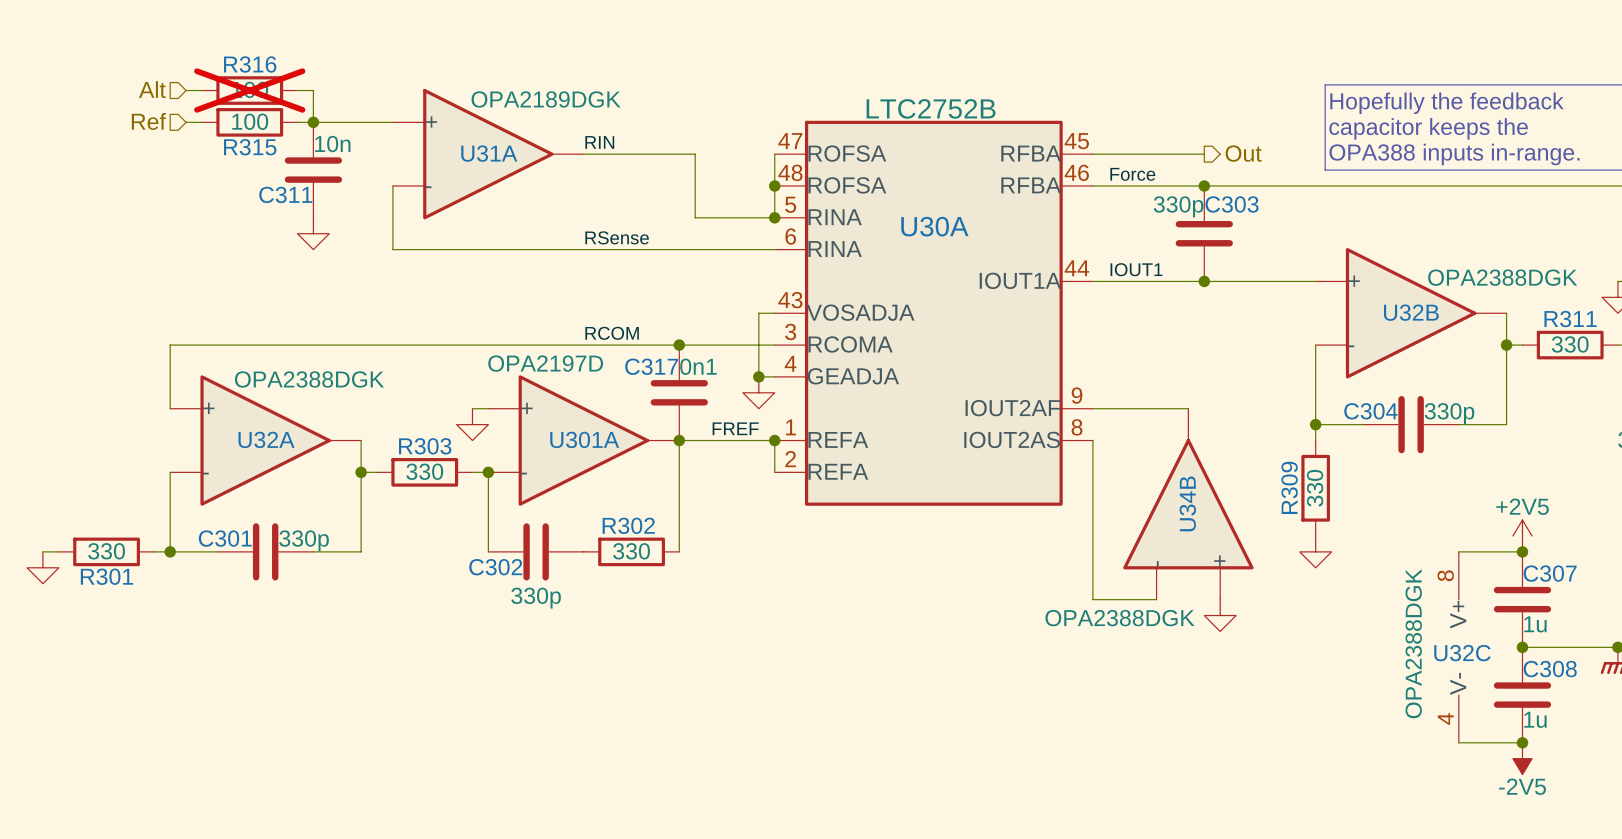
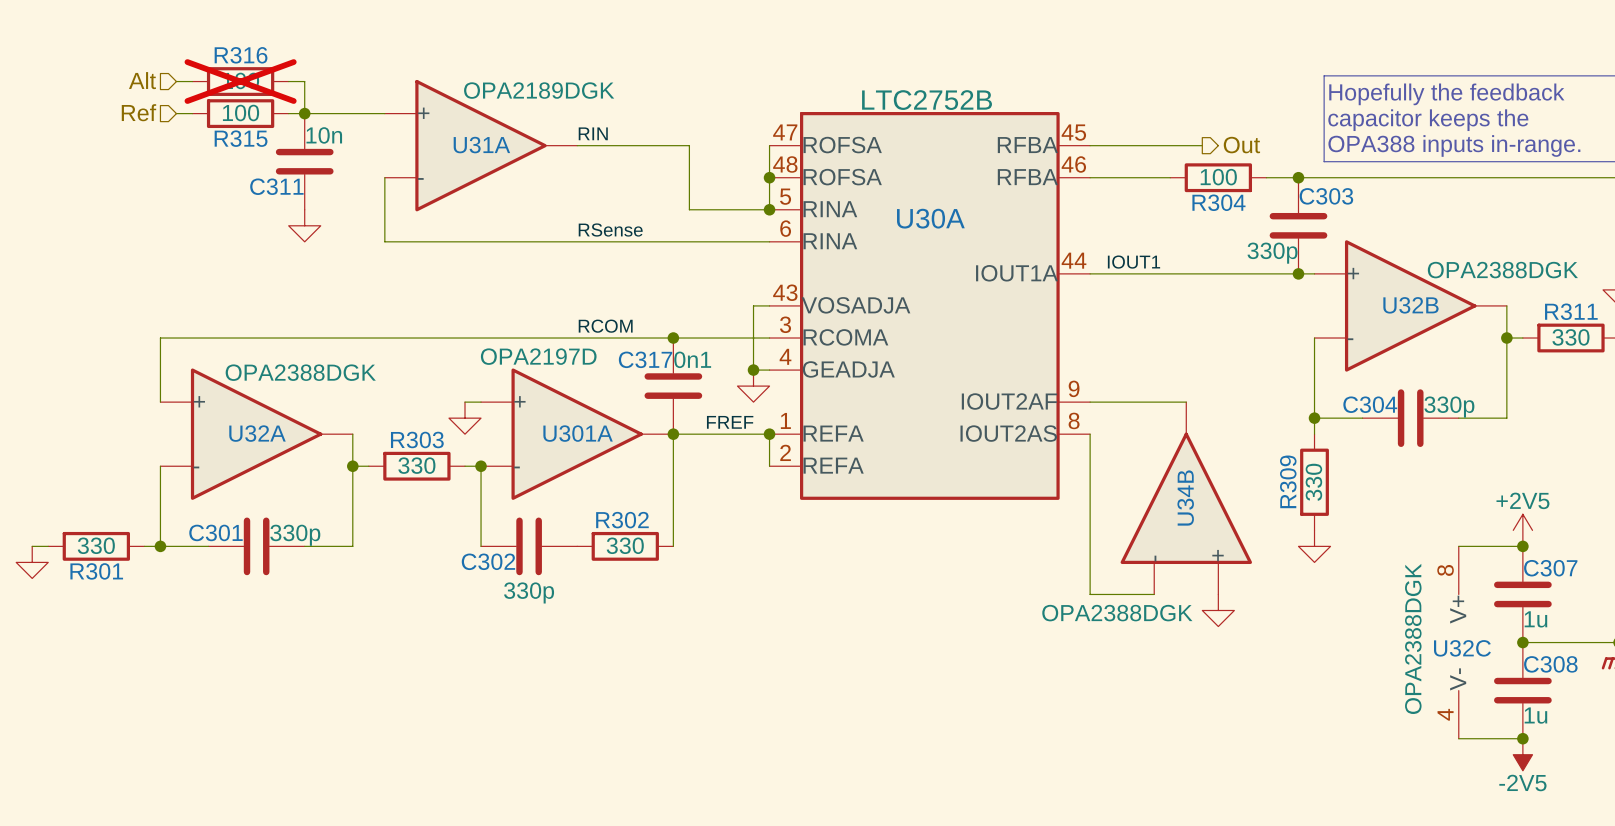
label: Force (1132, 174) -> none
wire: (1172, 185) (1267, 185) -> none
junction: (1204, 185) -> none
R304: none -> 100 (1218, 177)
junction: none -> (1298, 177)
C303 value position: 330p (1178, 206) -> 330p (1272, 253)
C303 position: (1204, 233) -> (1298, 225)
junction: (1204, 281) -> none
junction: none -> (1298, 273)

